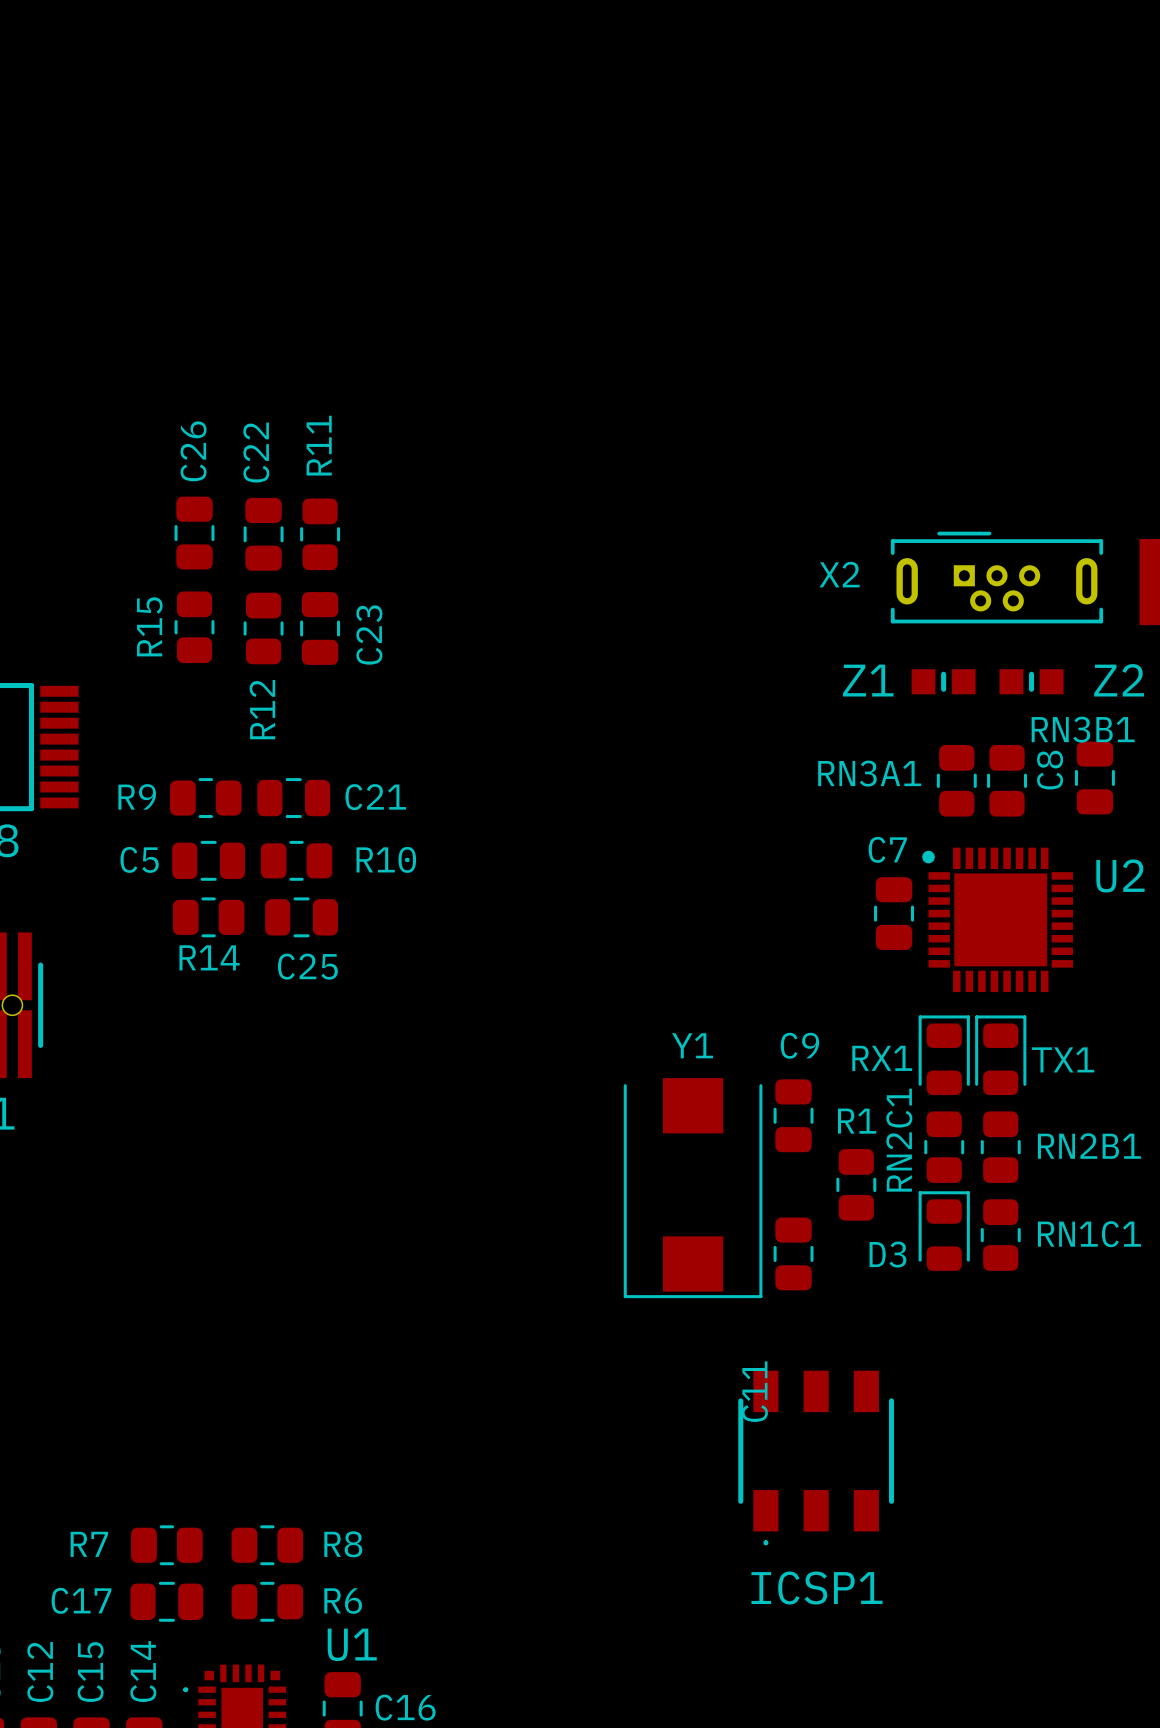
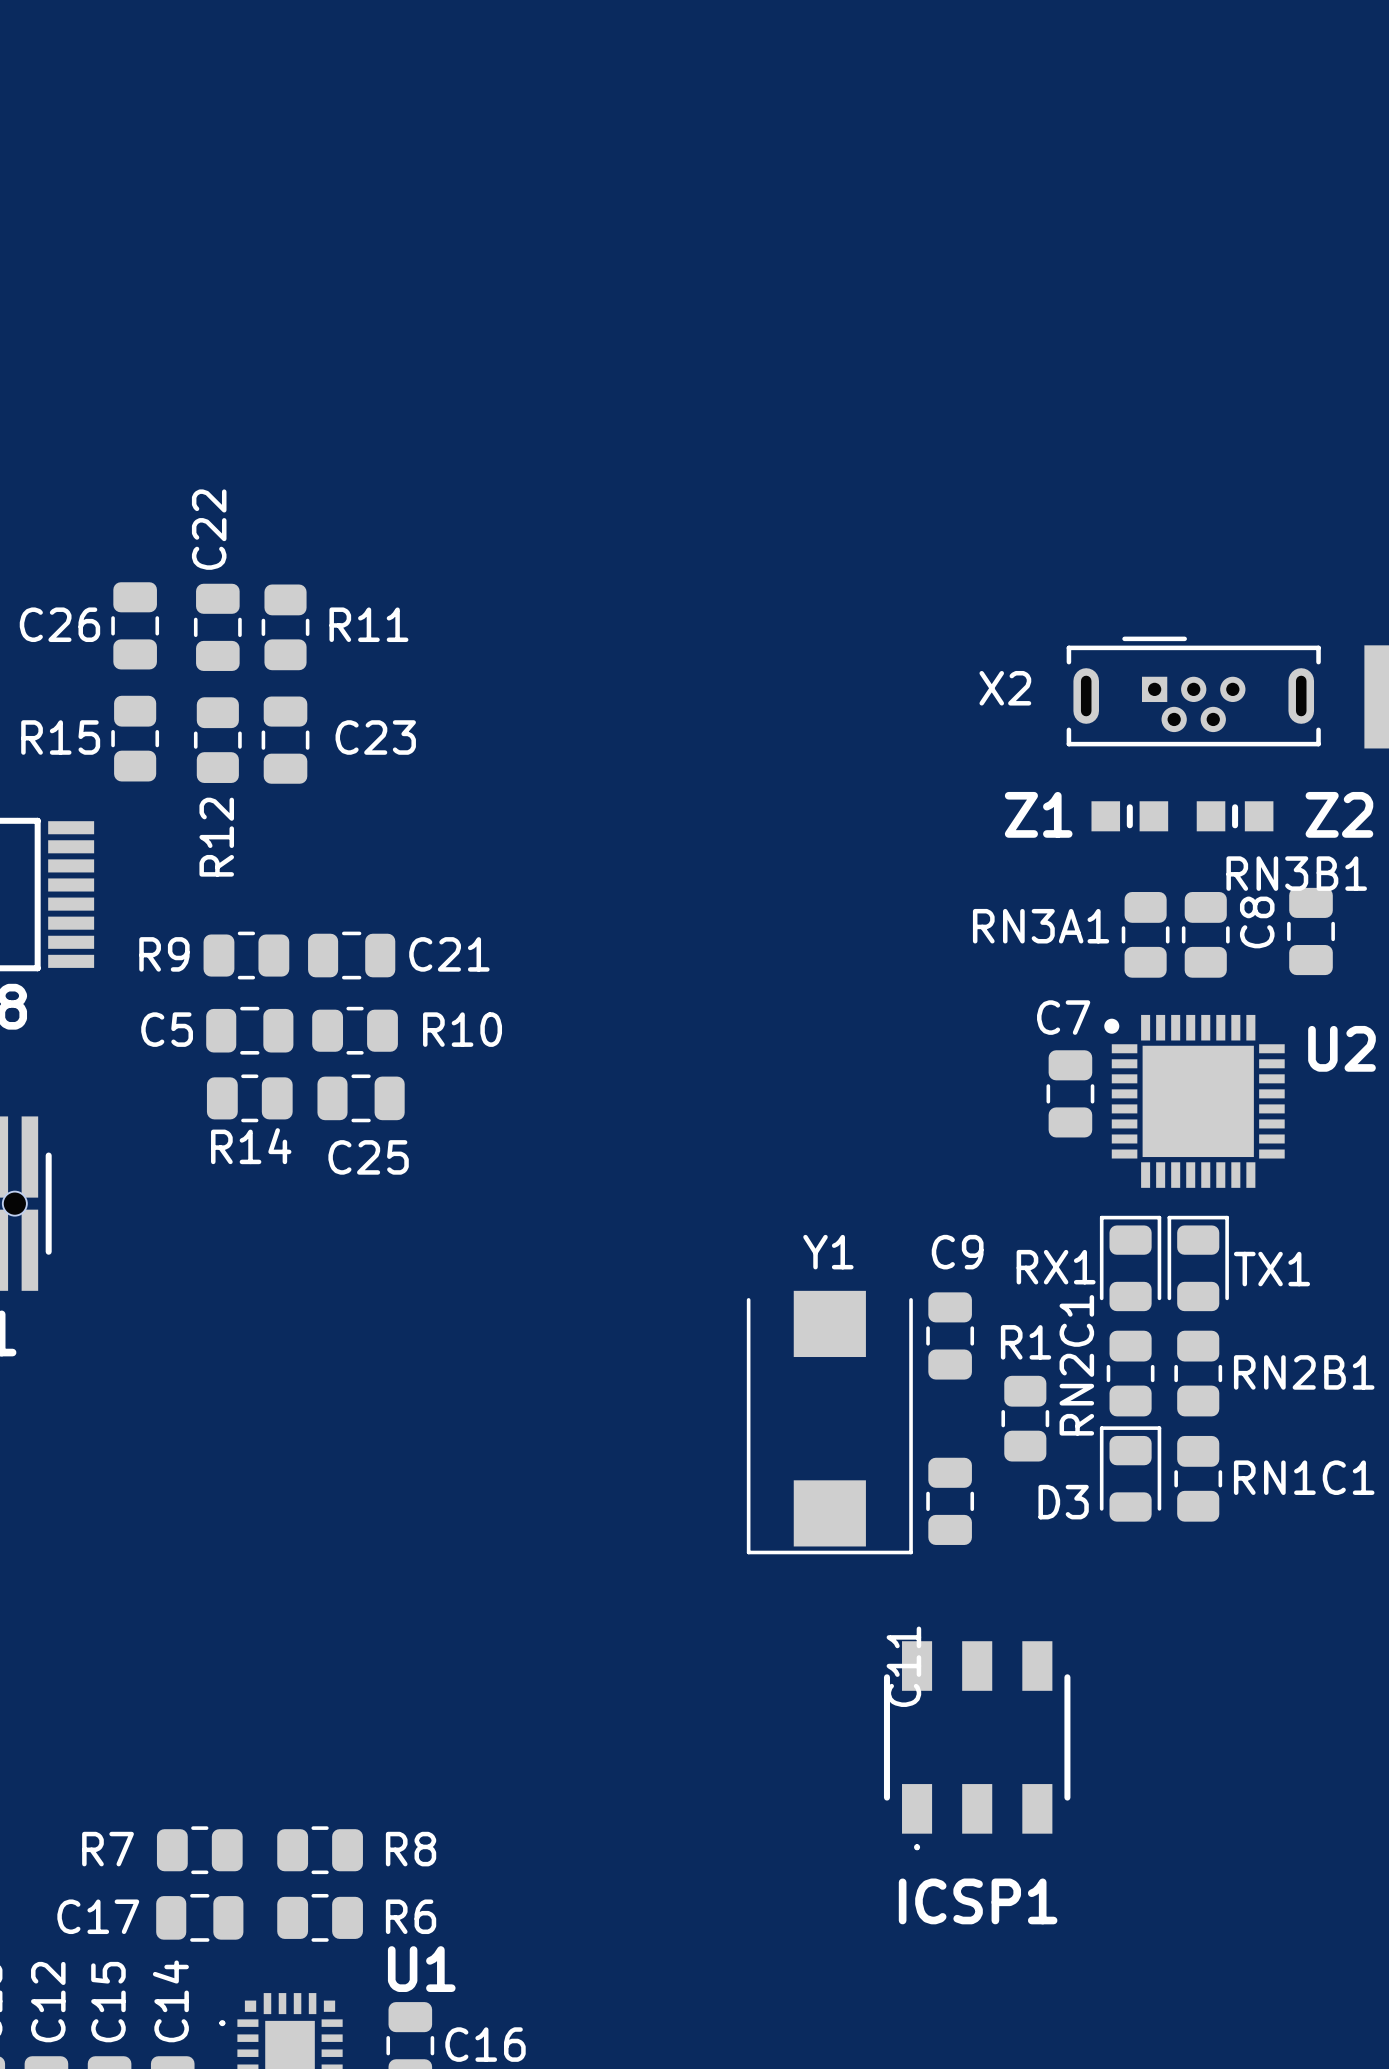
R11 name rotation: 0° (319, 445) -> 90° clockwise (368, 624)
C26 name rotation: 0° (193, 451) -> 90° clockwise (59, 624)
C26 name position: C26 (193, 451) -> C26 (59, 624)
C26 position: (194, 533) -> (135, 625)
C22 position: (263, 534) -> (217, 627)
R11 position: (320, 534) -> (285, 627)
R15 name rotation: 0° (149, 626) -> 90° clockwise (60, 737)
R15 position: (194, 627) -> (135, 738)
R12 position: (263, 628) -> (217, 740)
C23 position: (320, 628) -> (285, 740)
C23 name rotation: 0° (369, 635) -> 90° clockwise (375, 737)

